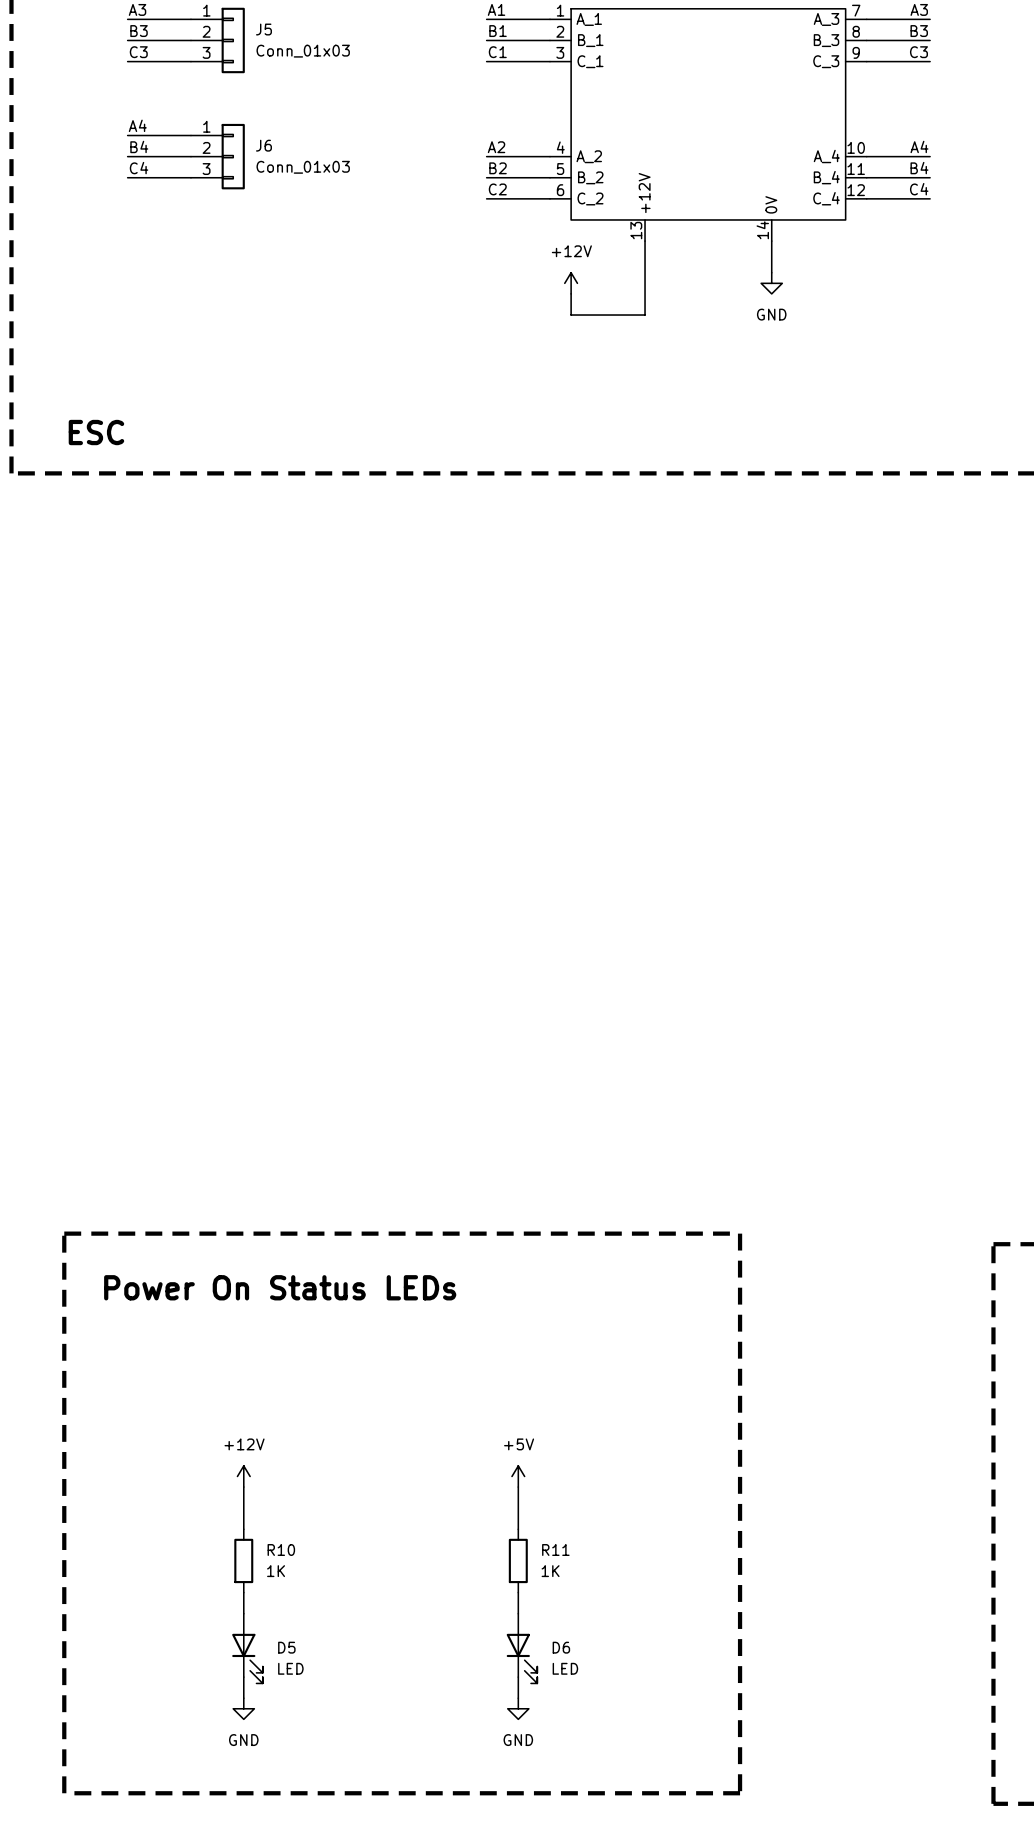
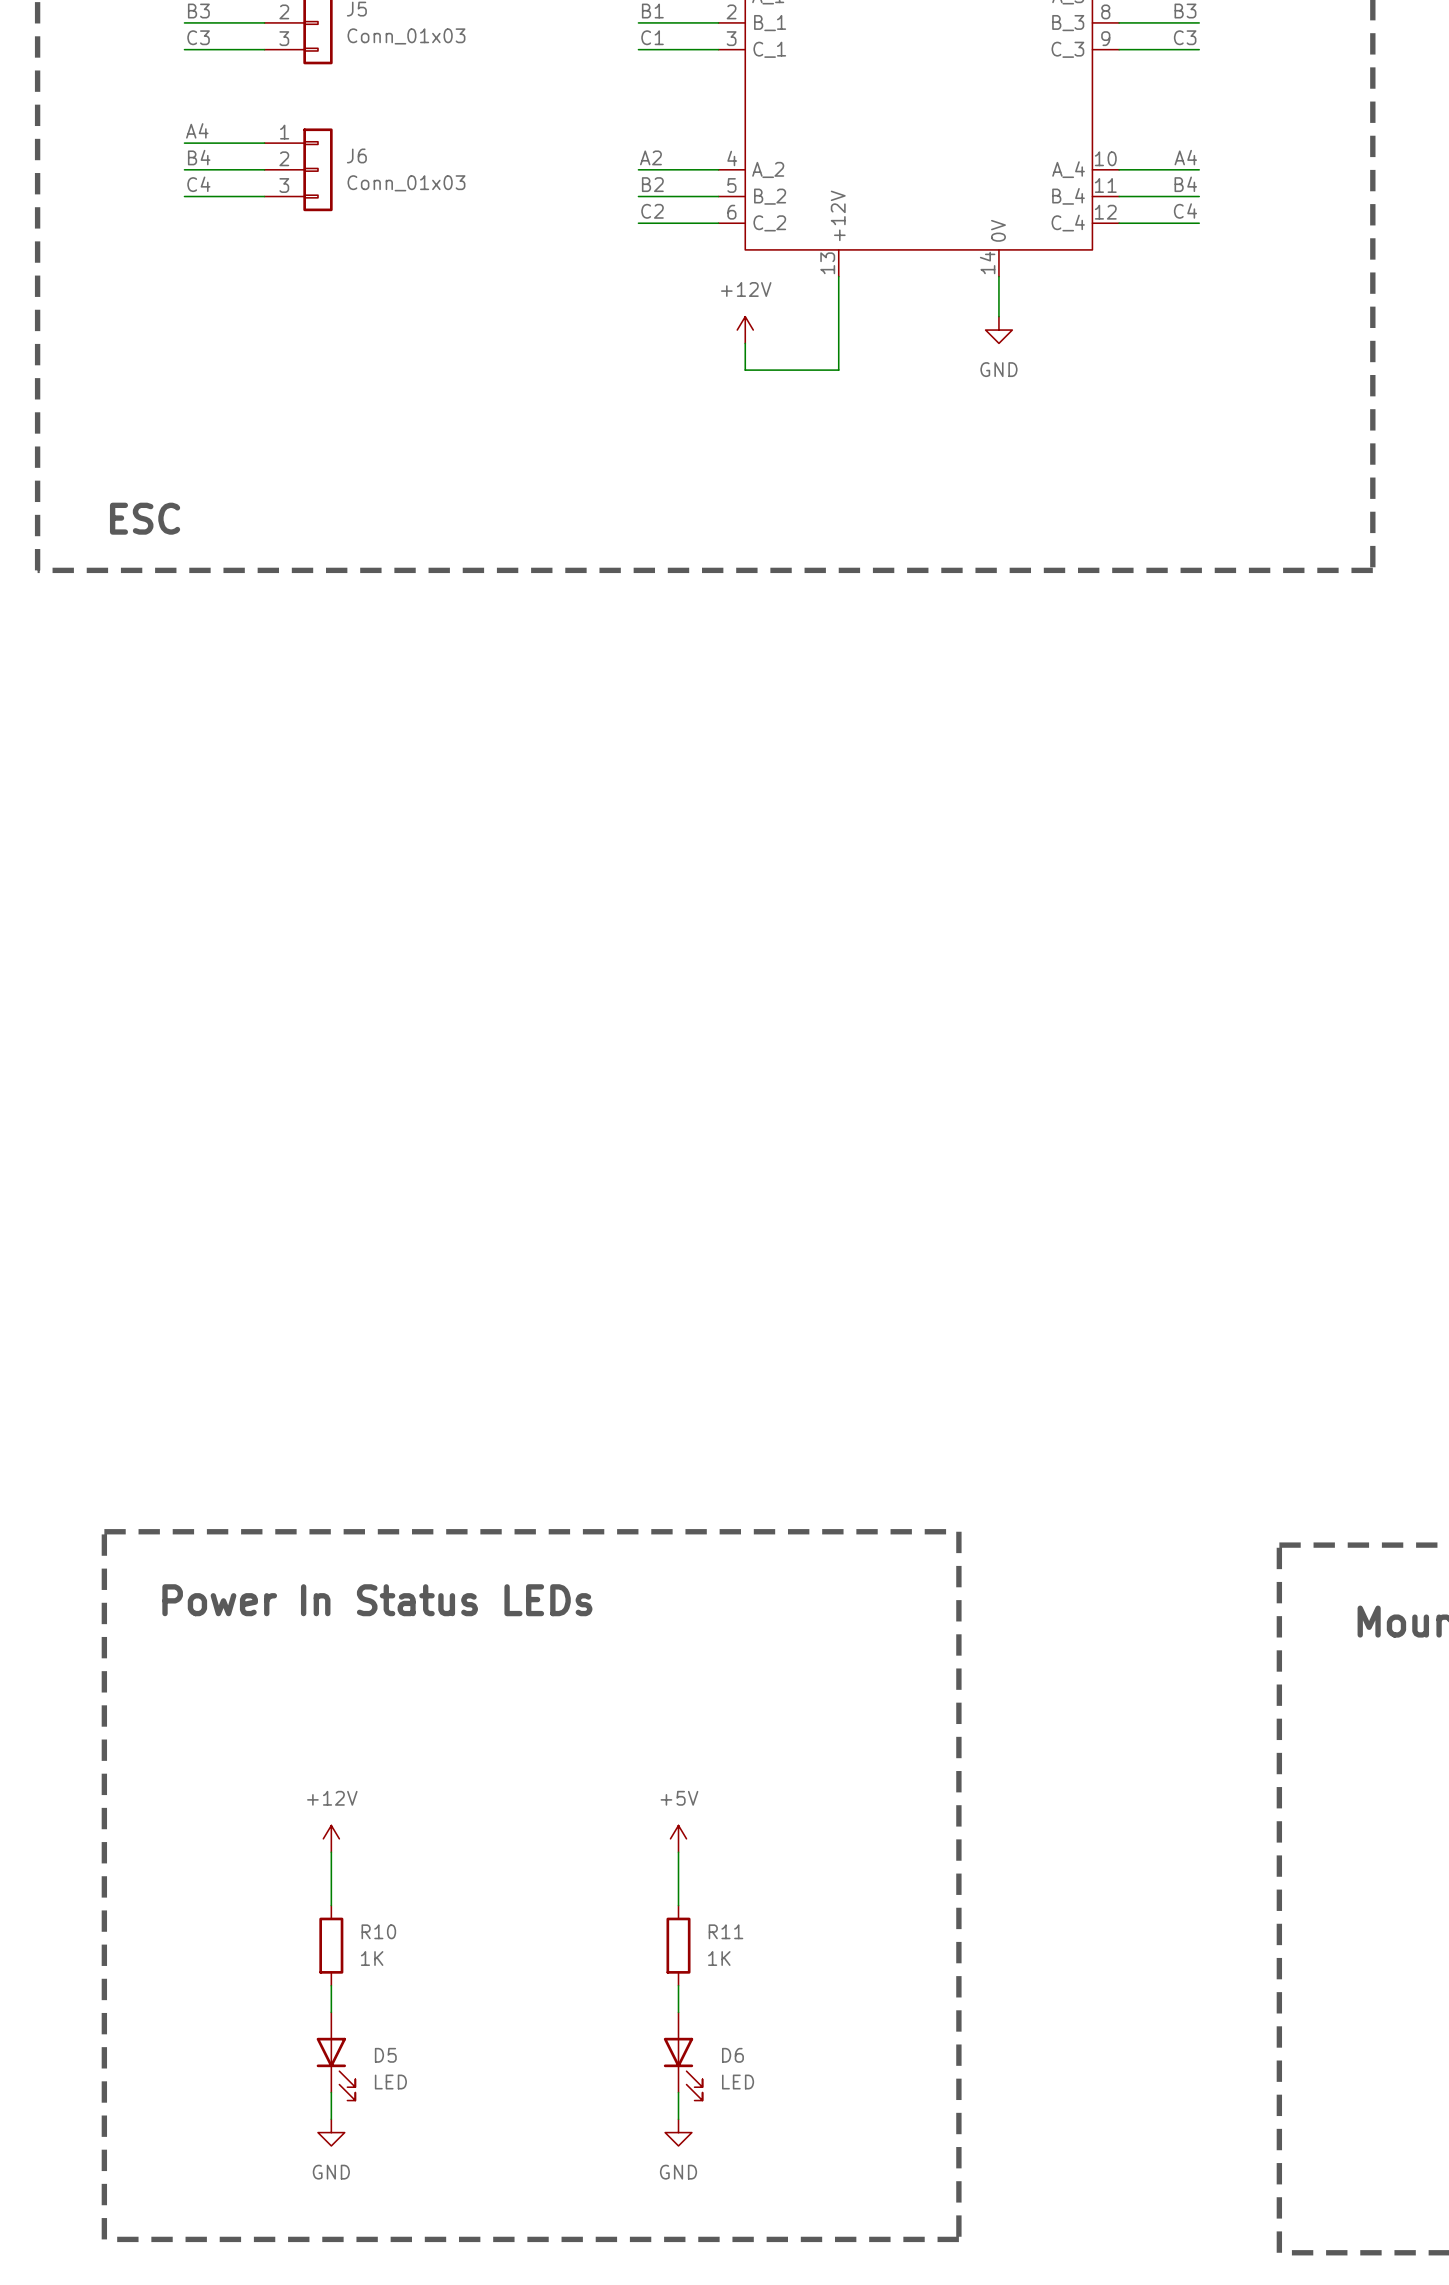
text: Power On Status LEDs (280, 1287) -> Power In Status LEDs (377, 1600)

